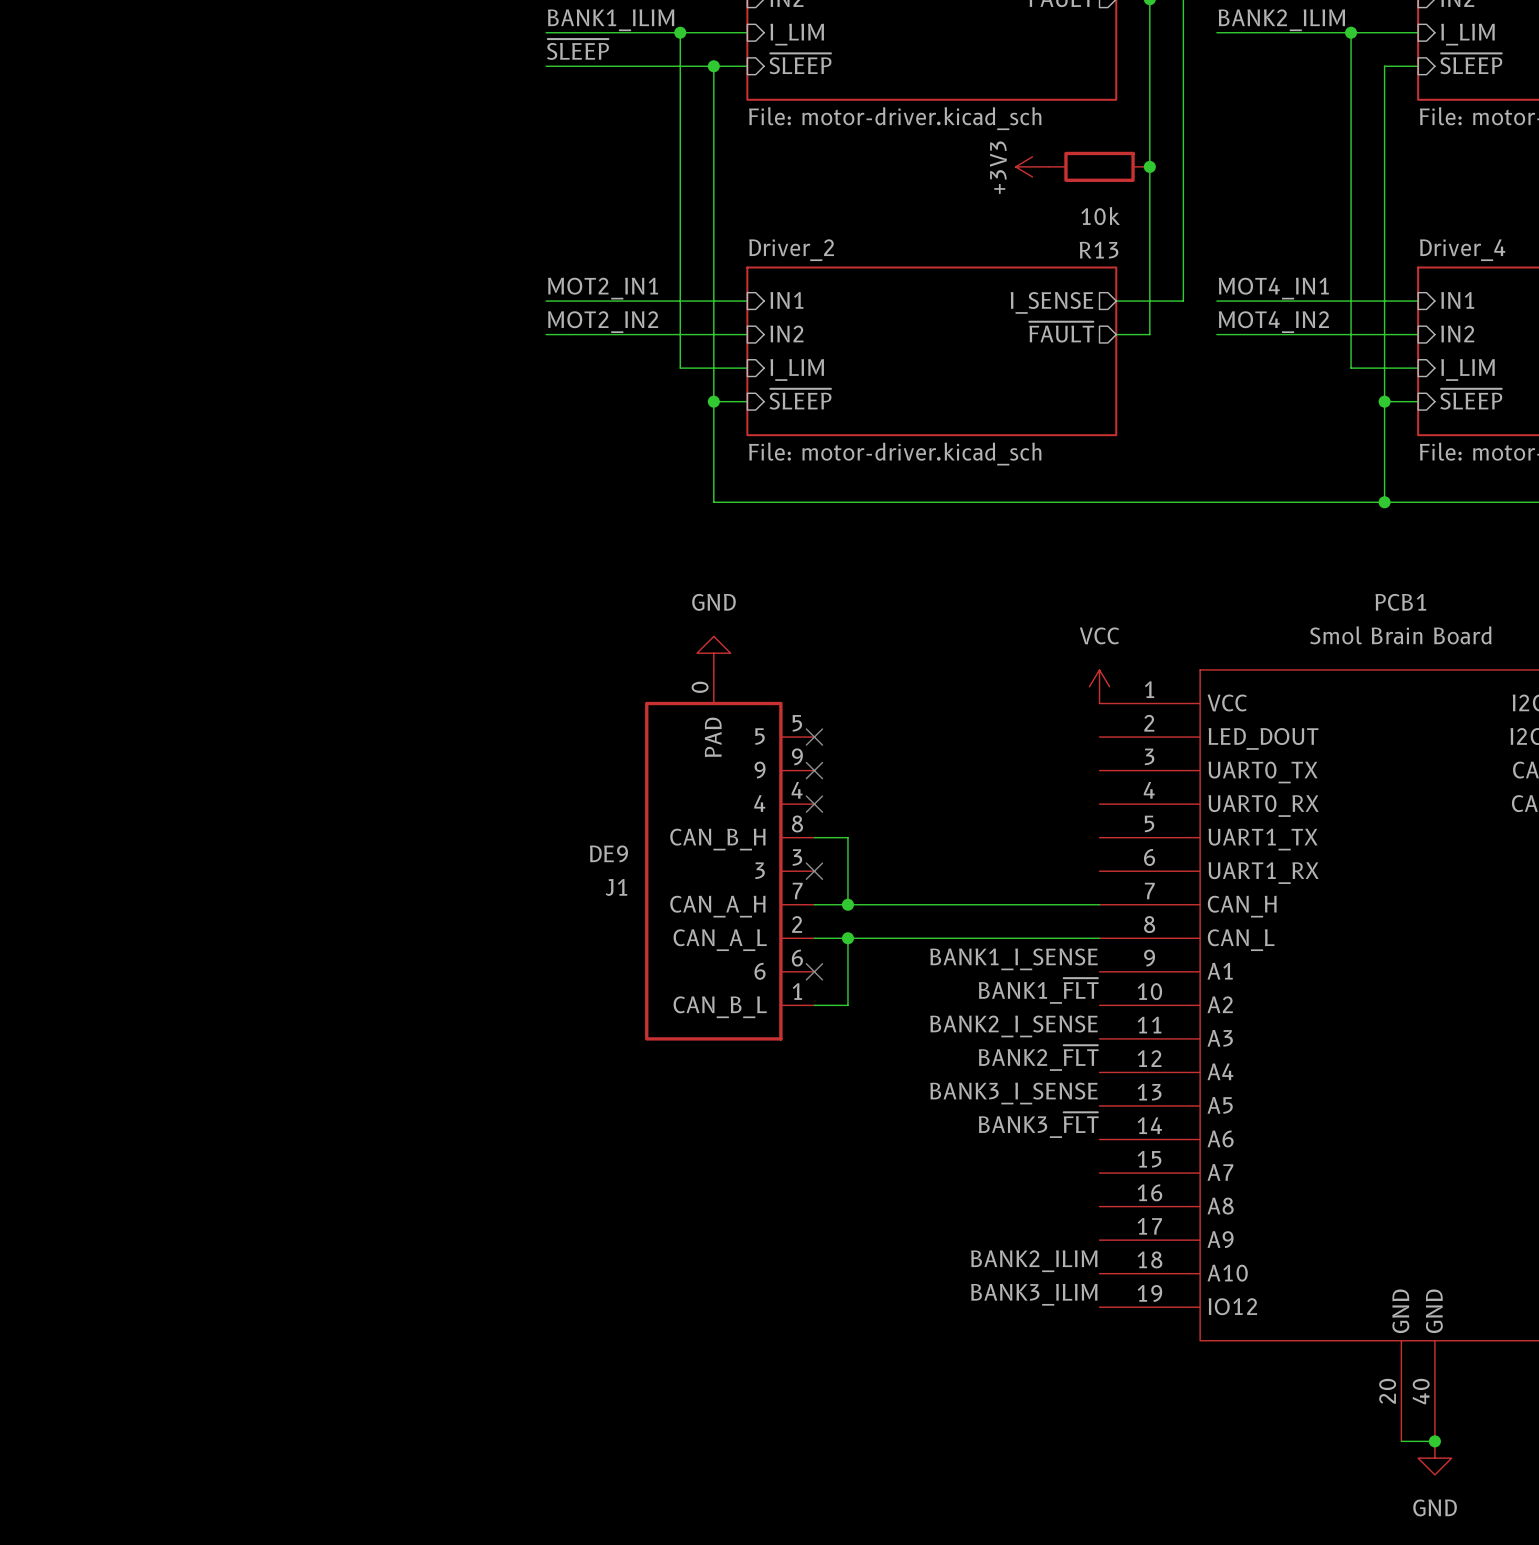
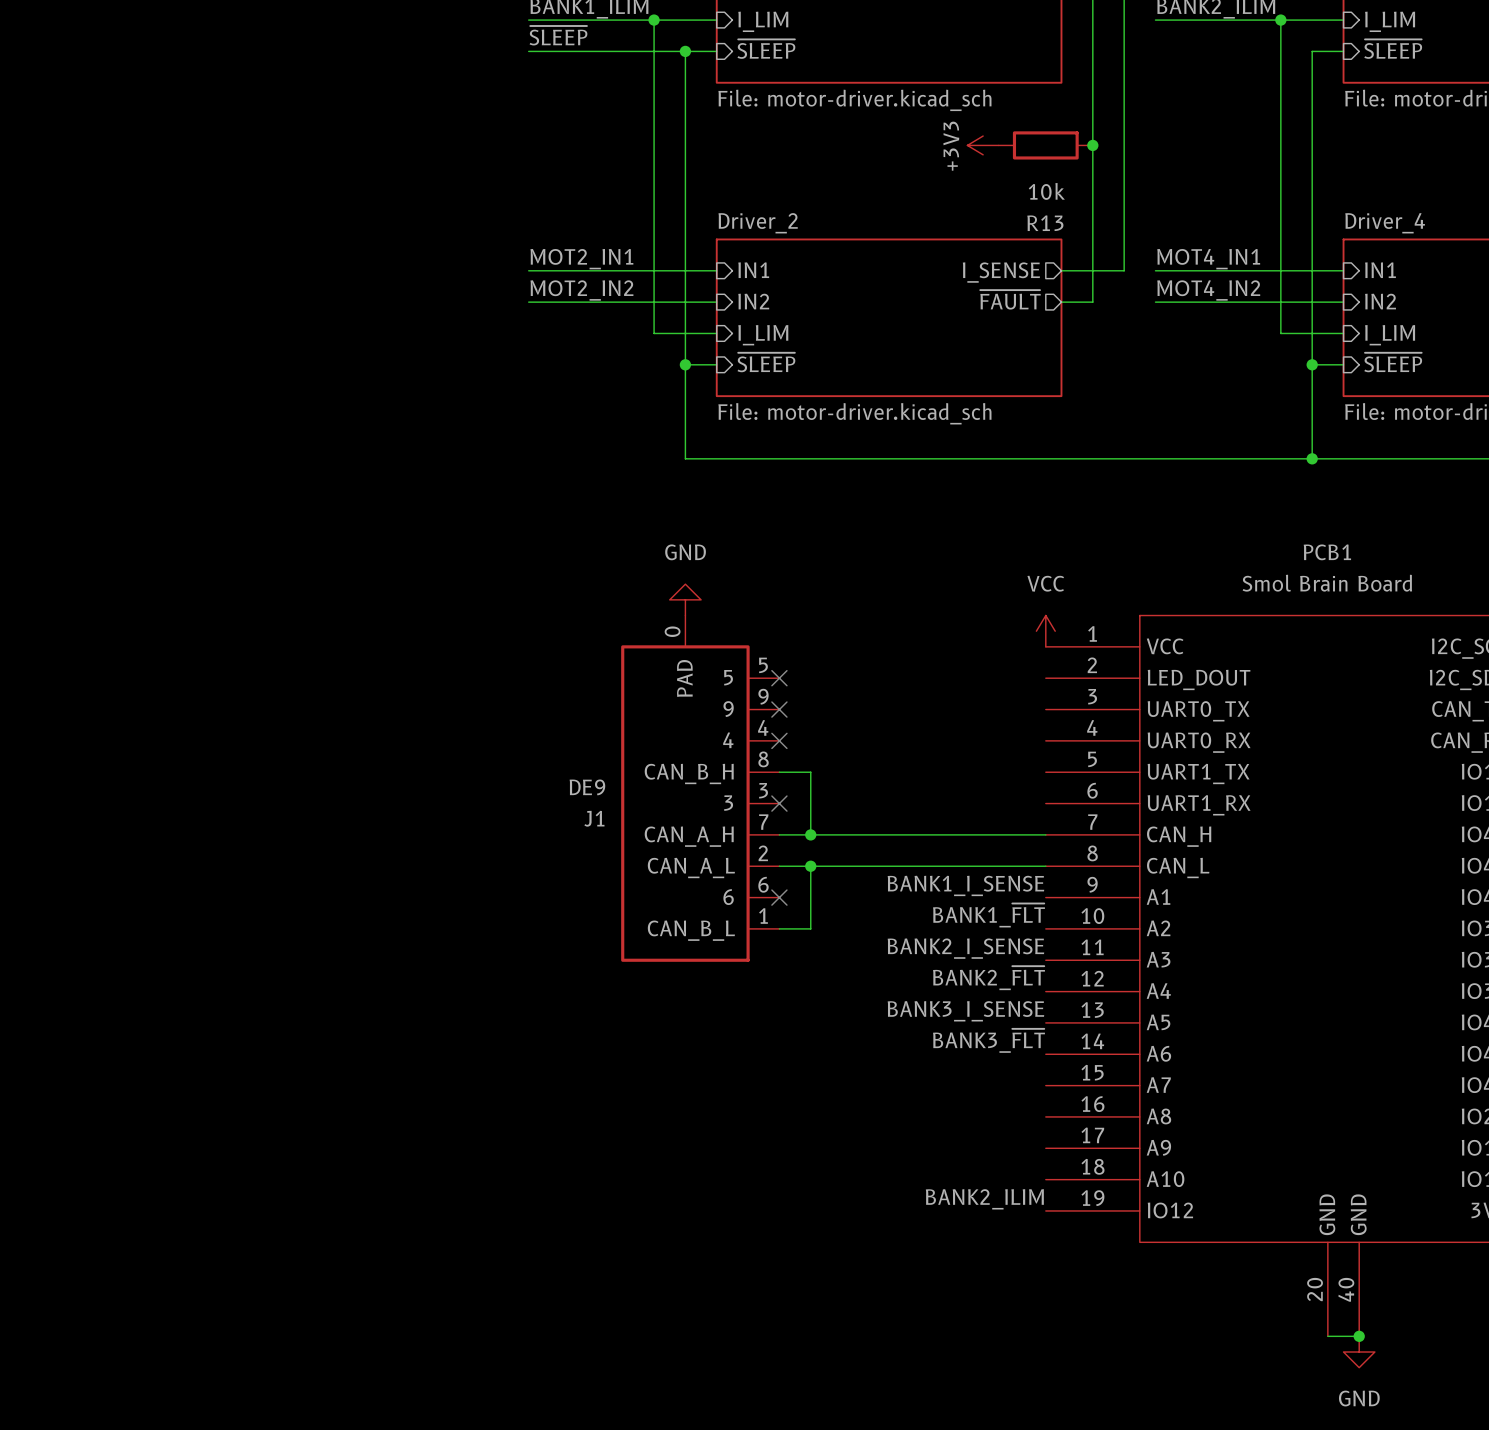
label: BANK2_ILIM (1034, 1261) -> none
label: BANK3_ILIM (1034, 1294) -> BANK2_ILIM (984, 1199)

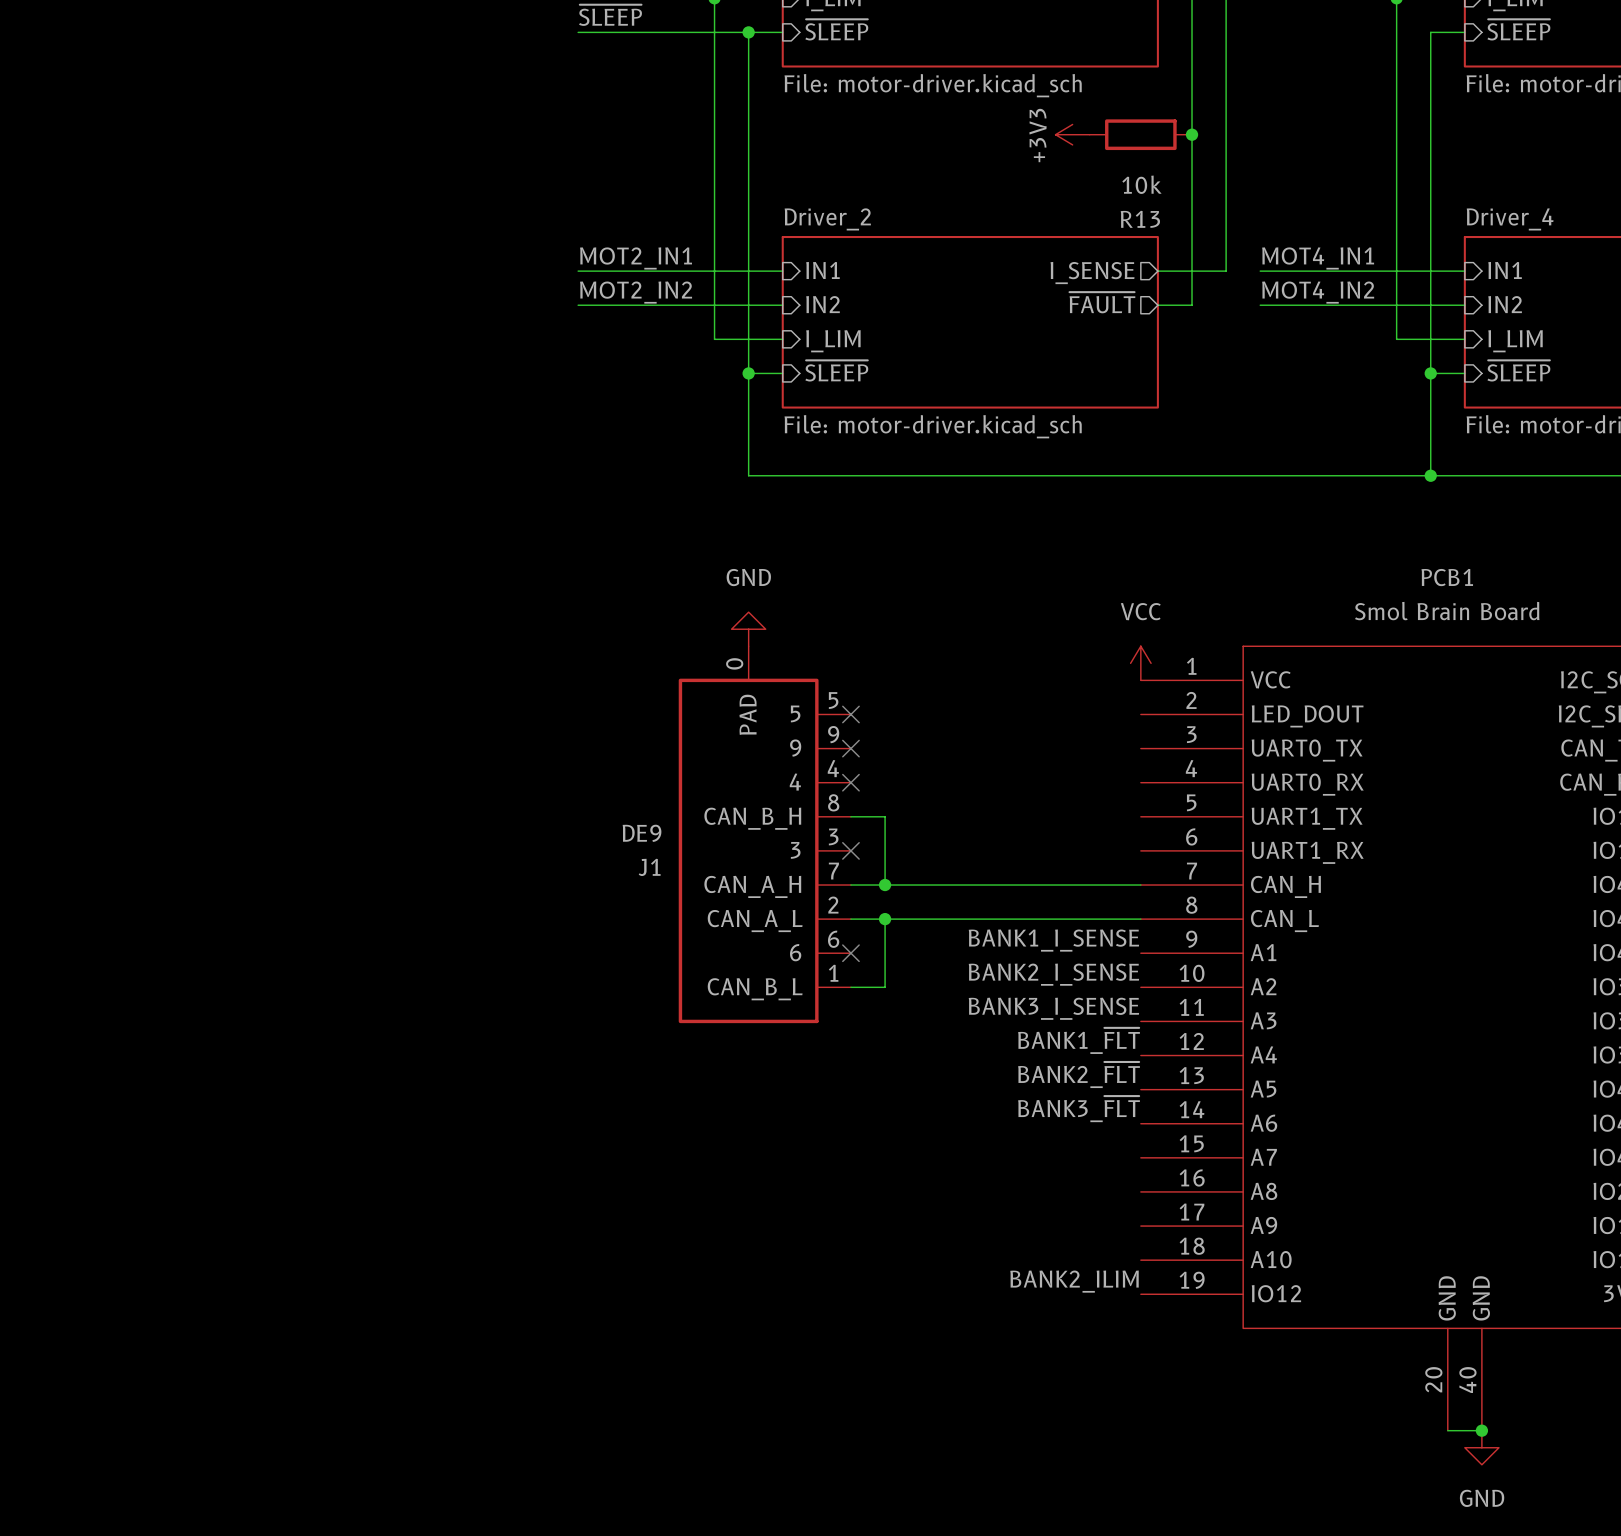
label: BANK1_~{FLT} (988, 915) -> BANK2_I_SENSE (1053, 974)
label: BANK2_I_SENSE (965, 948) -> BANK3_I_SENSE (1053, 1008)
label: BANK2_~{FLT} (988, 978) -> BANK1_~{FLT} (1079, 1040)
label: BANK3_I_SENSE (965, 1011) -> BANK2_~{FLT} (1079, 1075)

